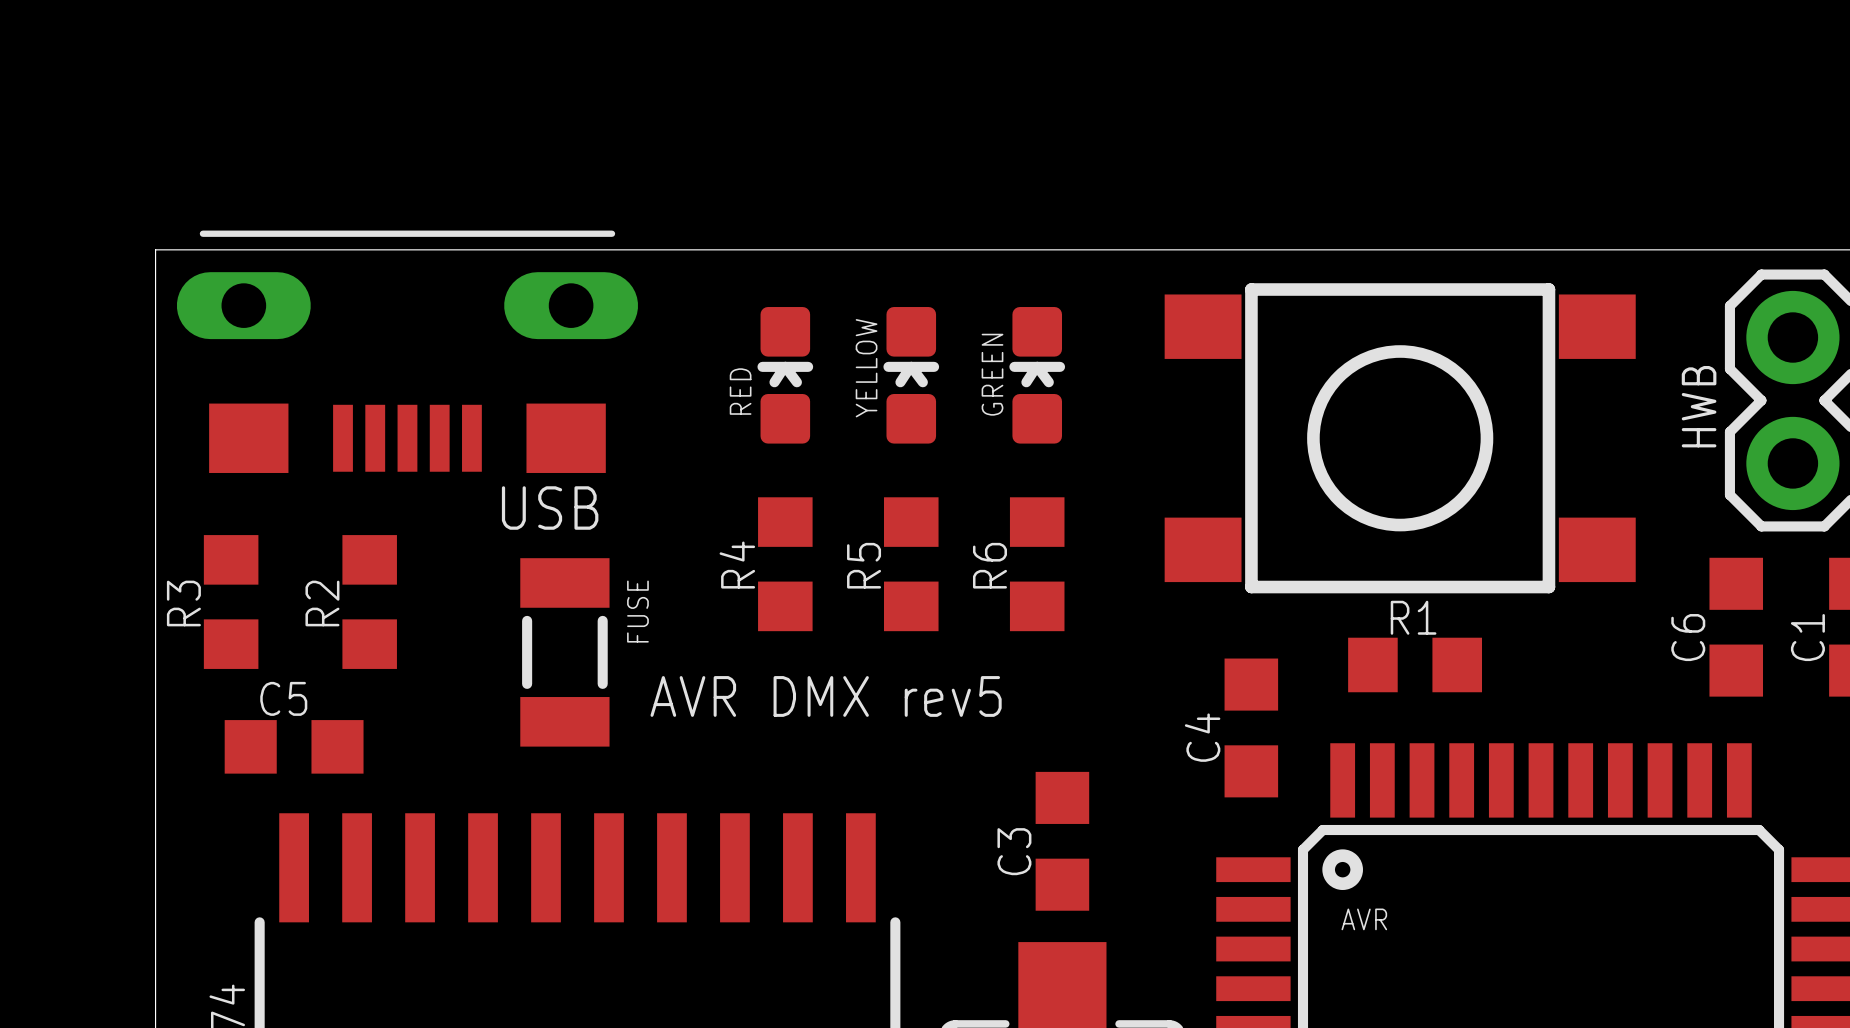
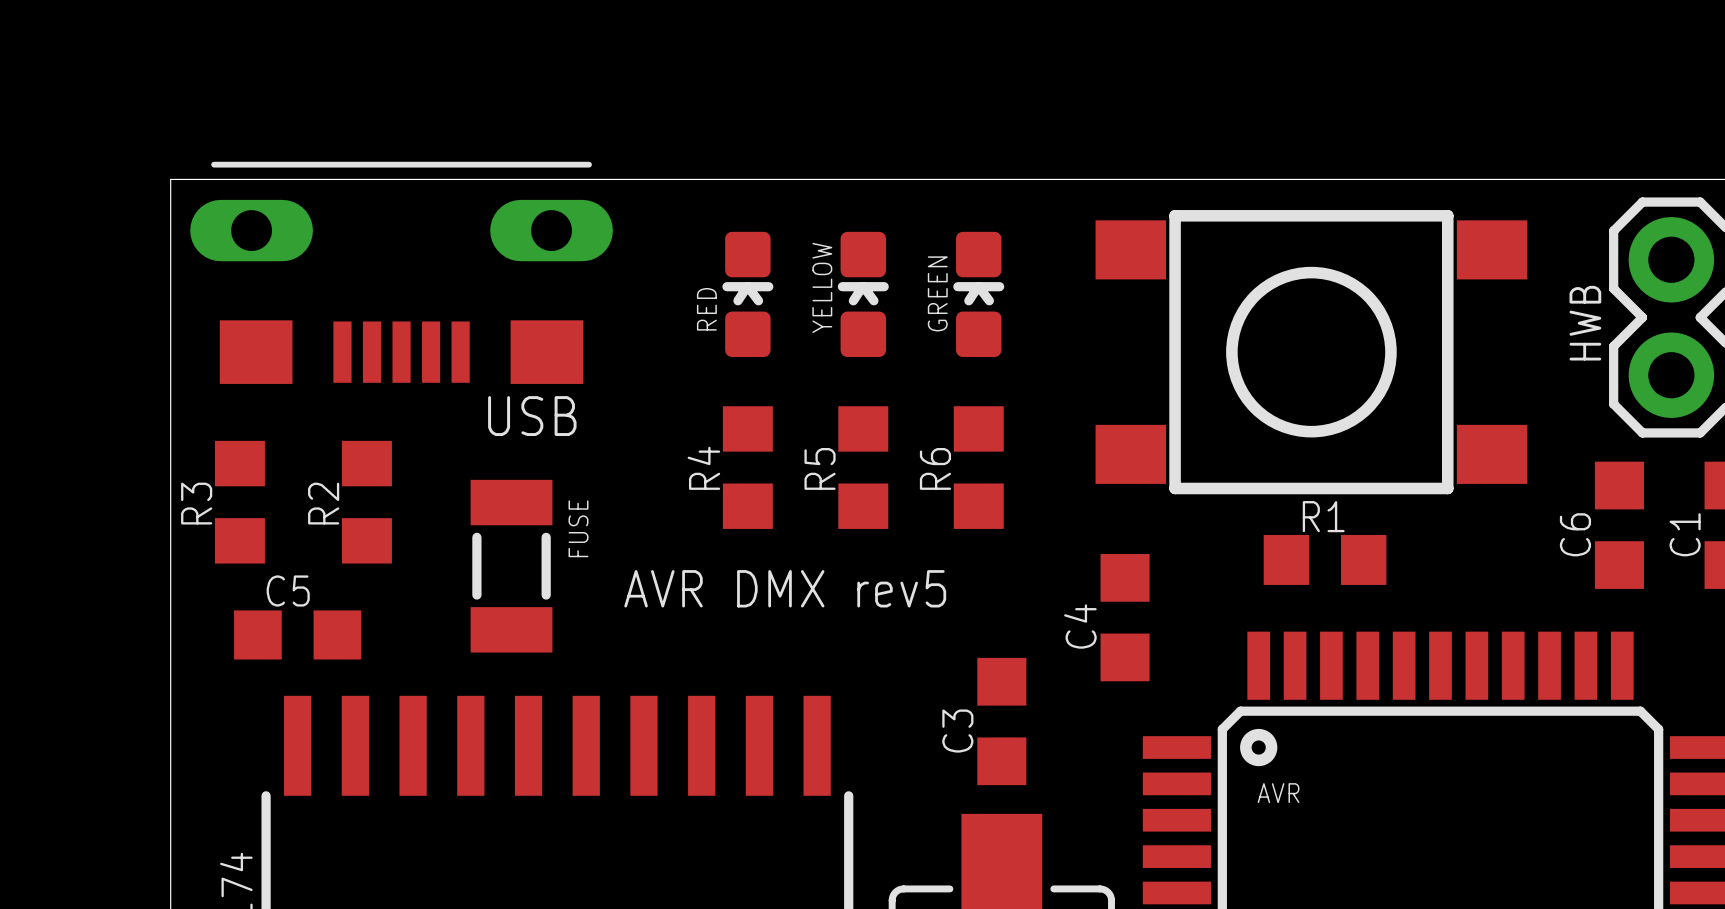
FUSE position: (564, 652) -> (511, 566)
C4 position: (1251, 727) -> (1125, 617)

